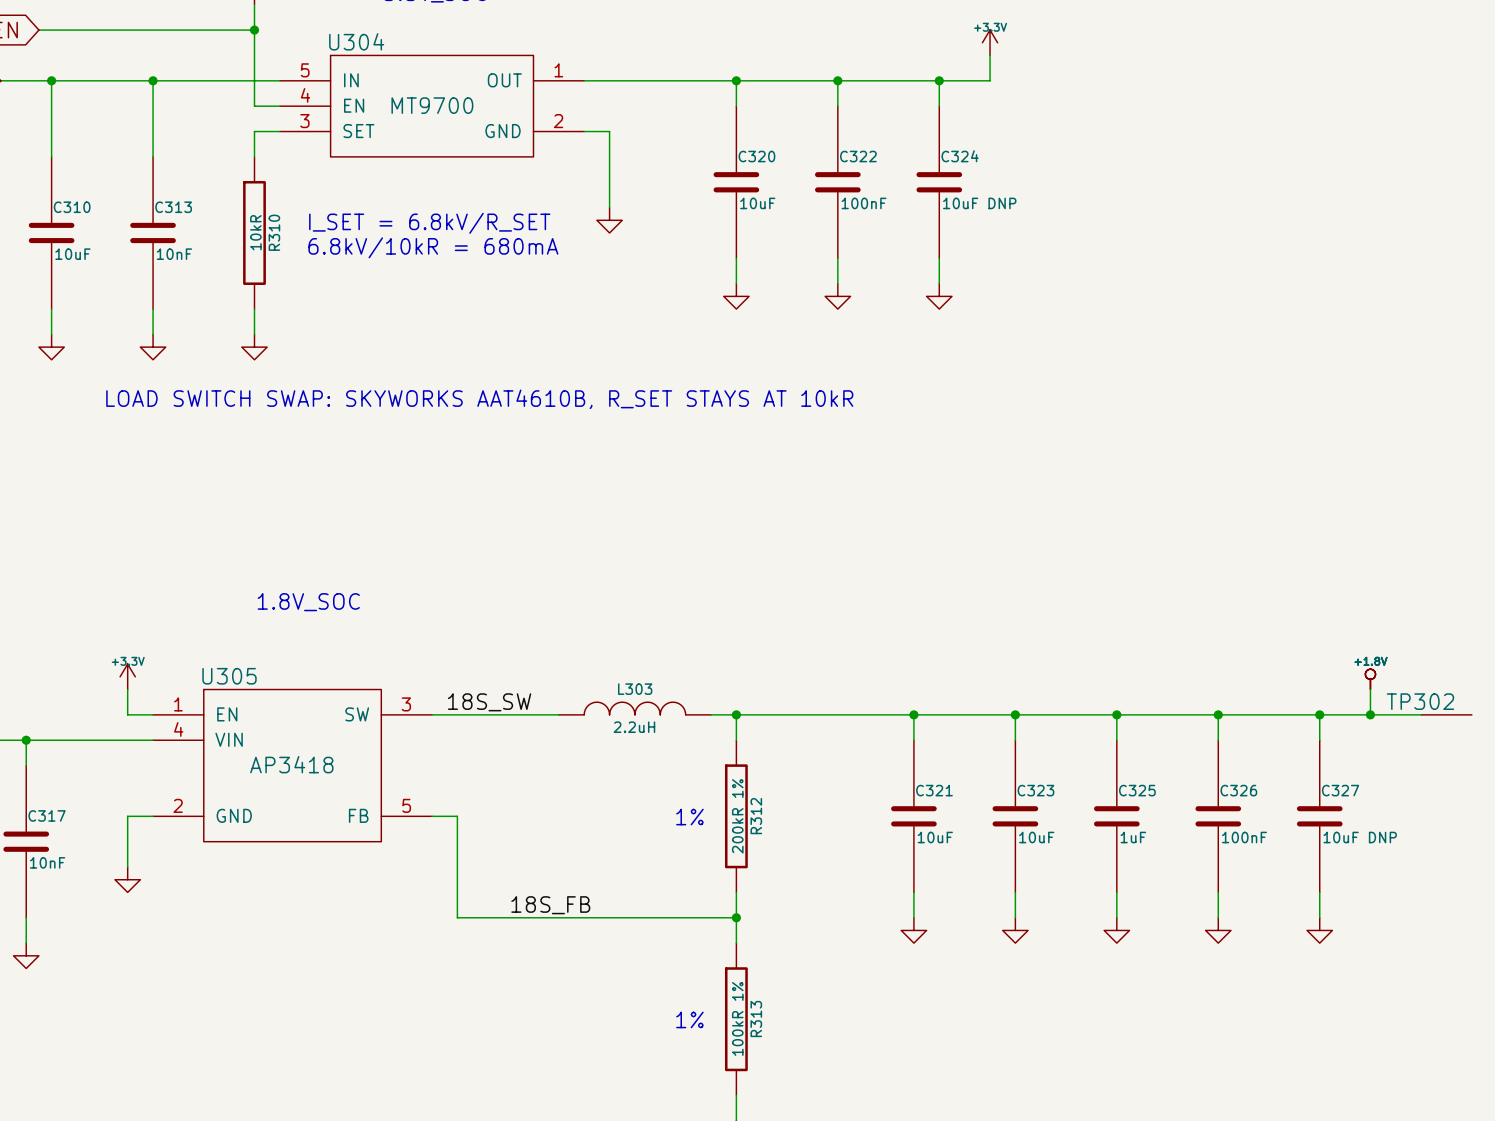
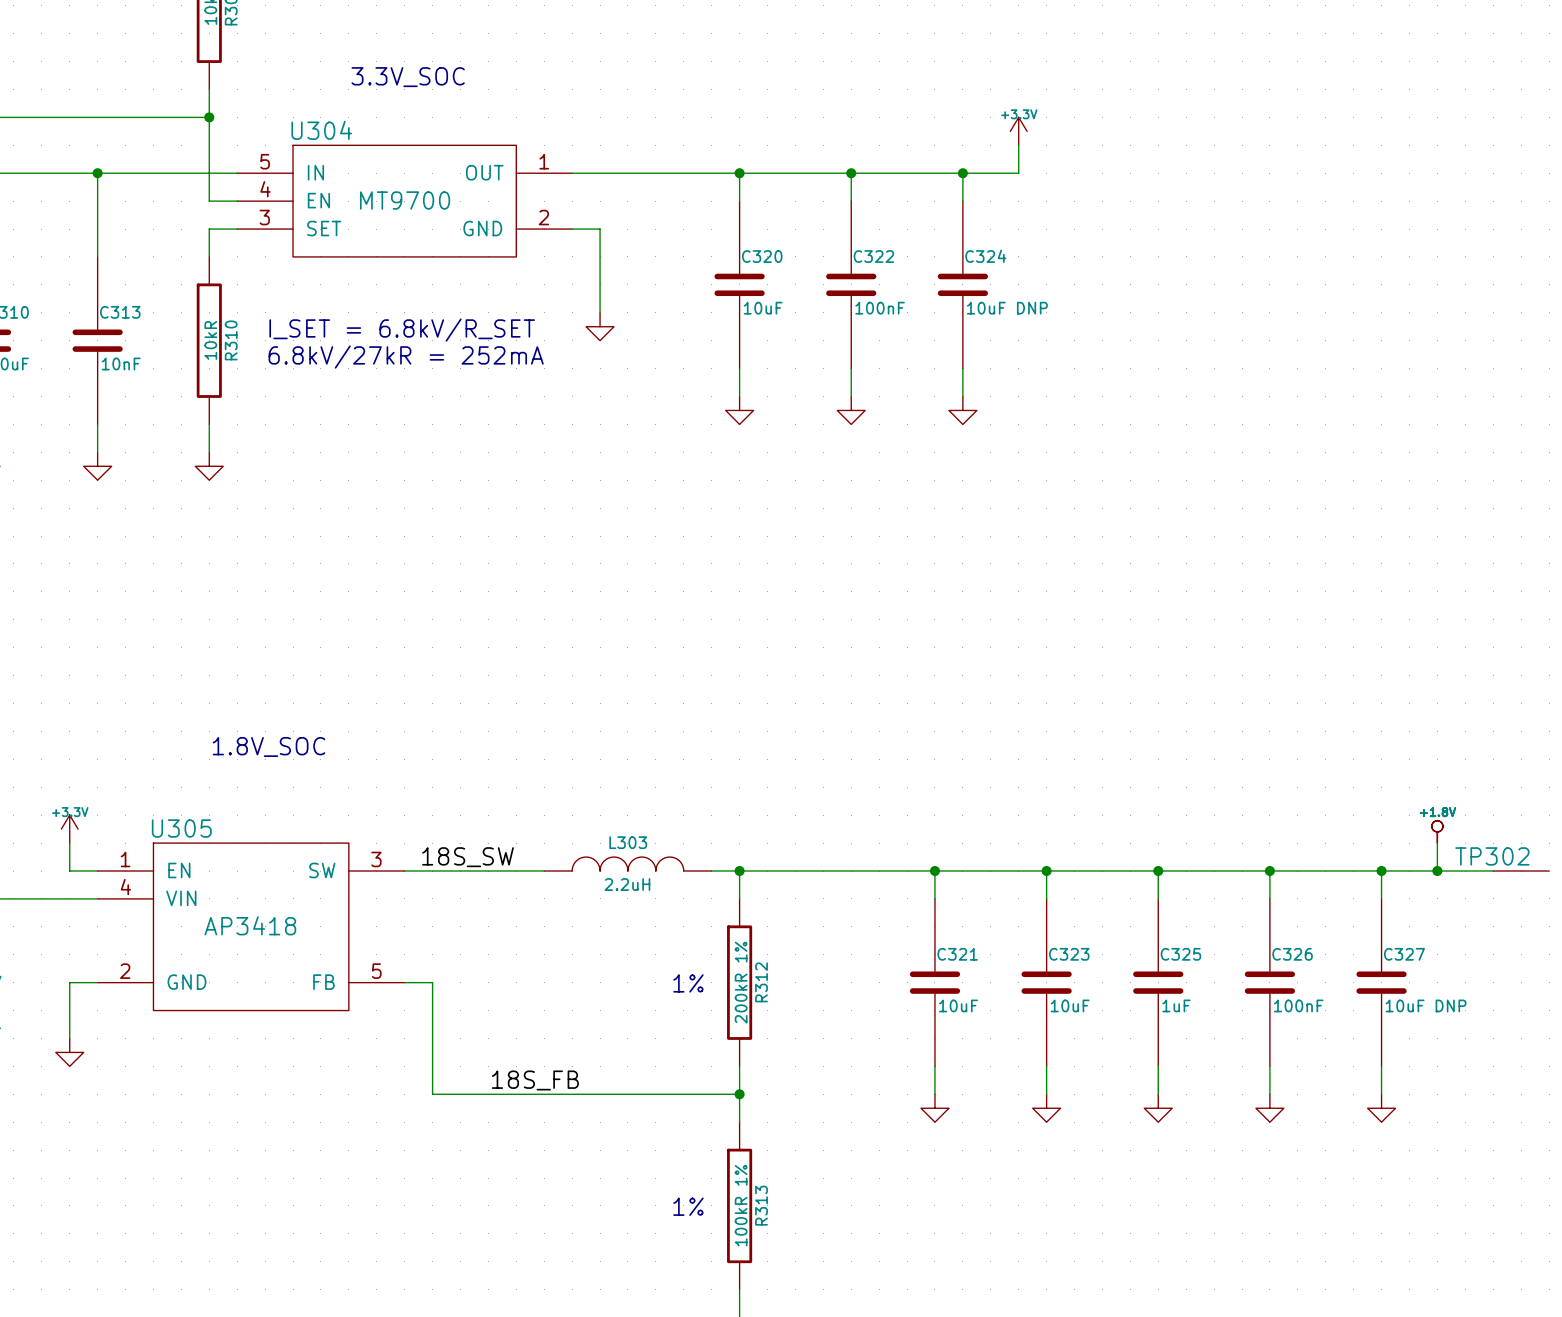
text: 6.8kV/10kR = 680mA (433, 247) -> 6.8kV/27kR = 252mA (406, 357)
text: LOAD SWITCH SWAP: SKYWORKS AAT4610B, R_SET STAYS AT 10kR (479, 399) -> none

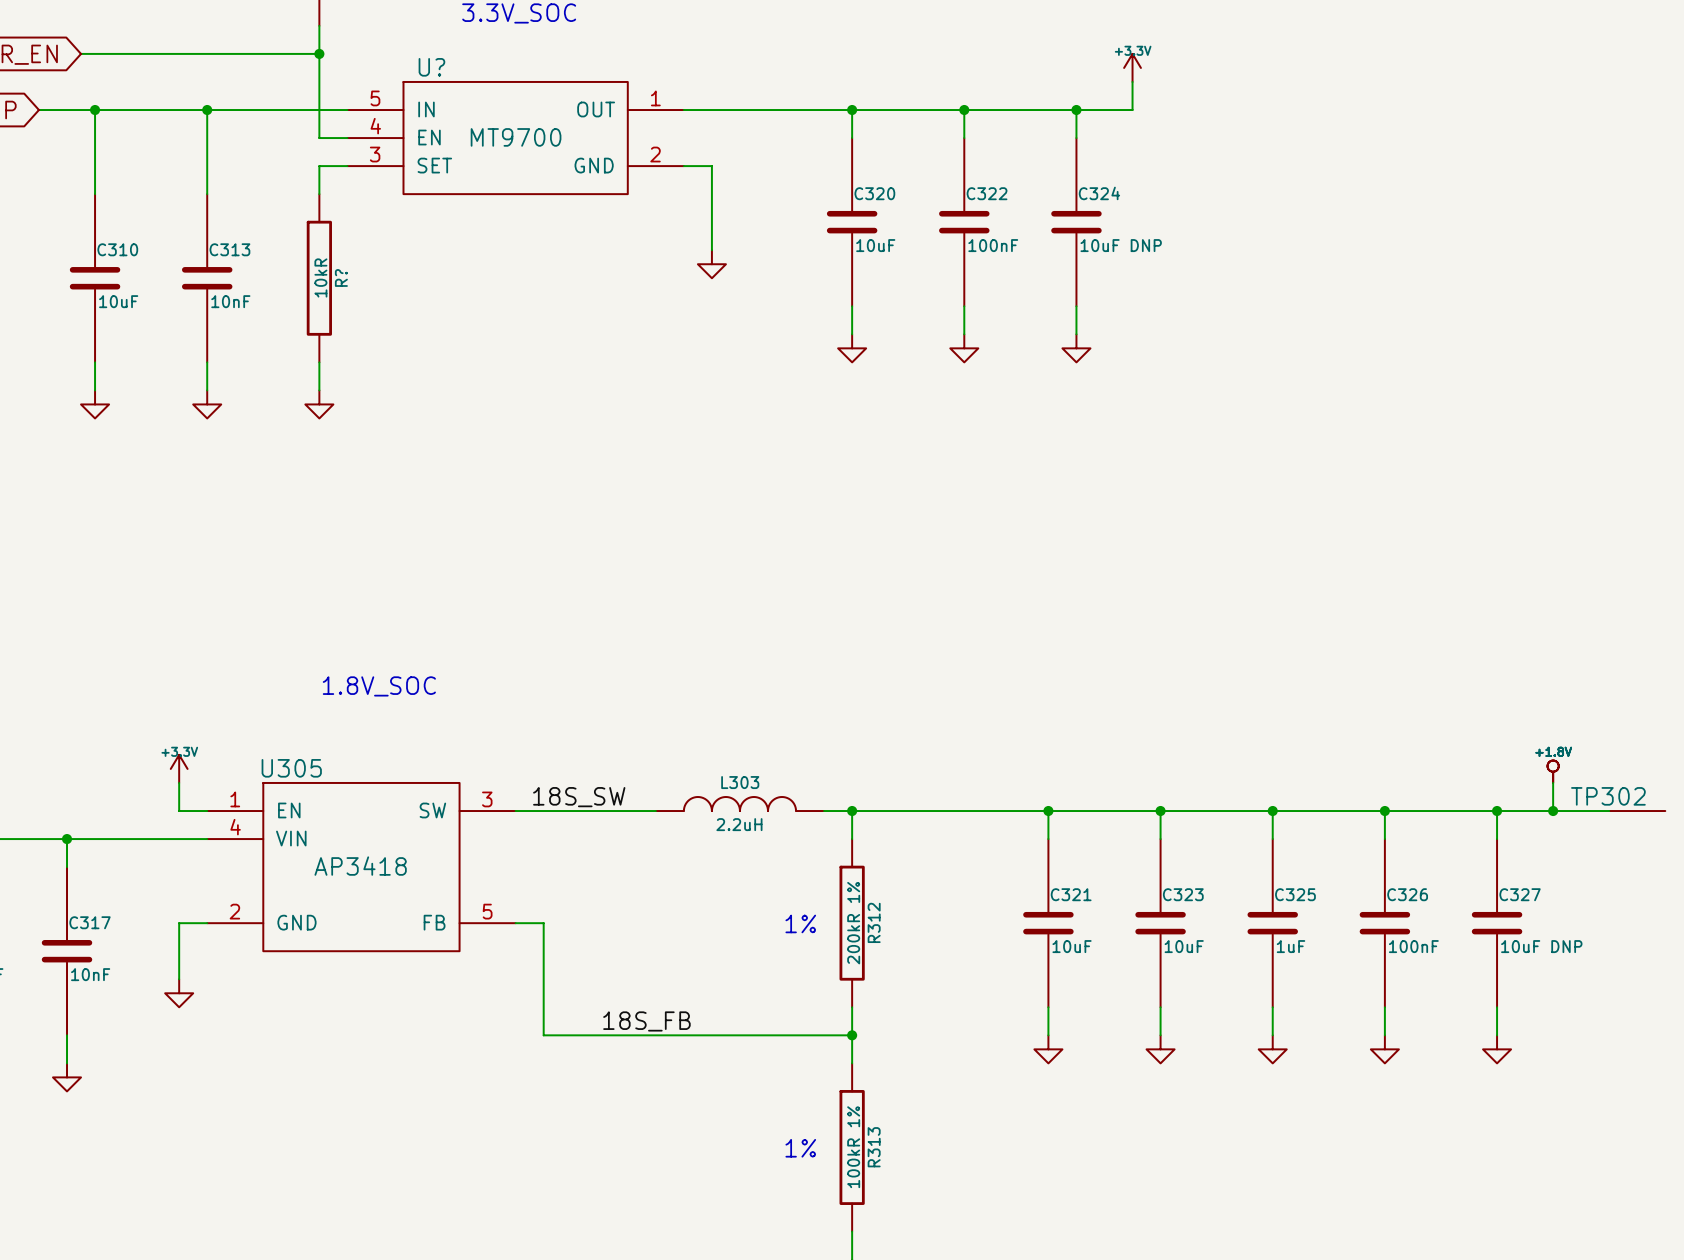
U304 name: U304 (321, 130) -> U? (431, 67)
text: I_SET = 6.8kV/R_SET (402, 330) -> none
R310 name: R310 (231, 340) -> R? (341, 277)
text: 6.8kV/27kR = 252mA (406, 357) -> none

